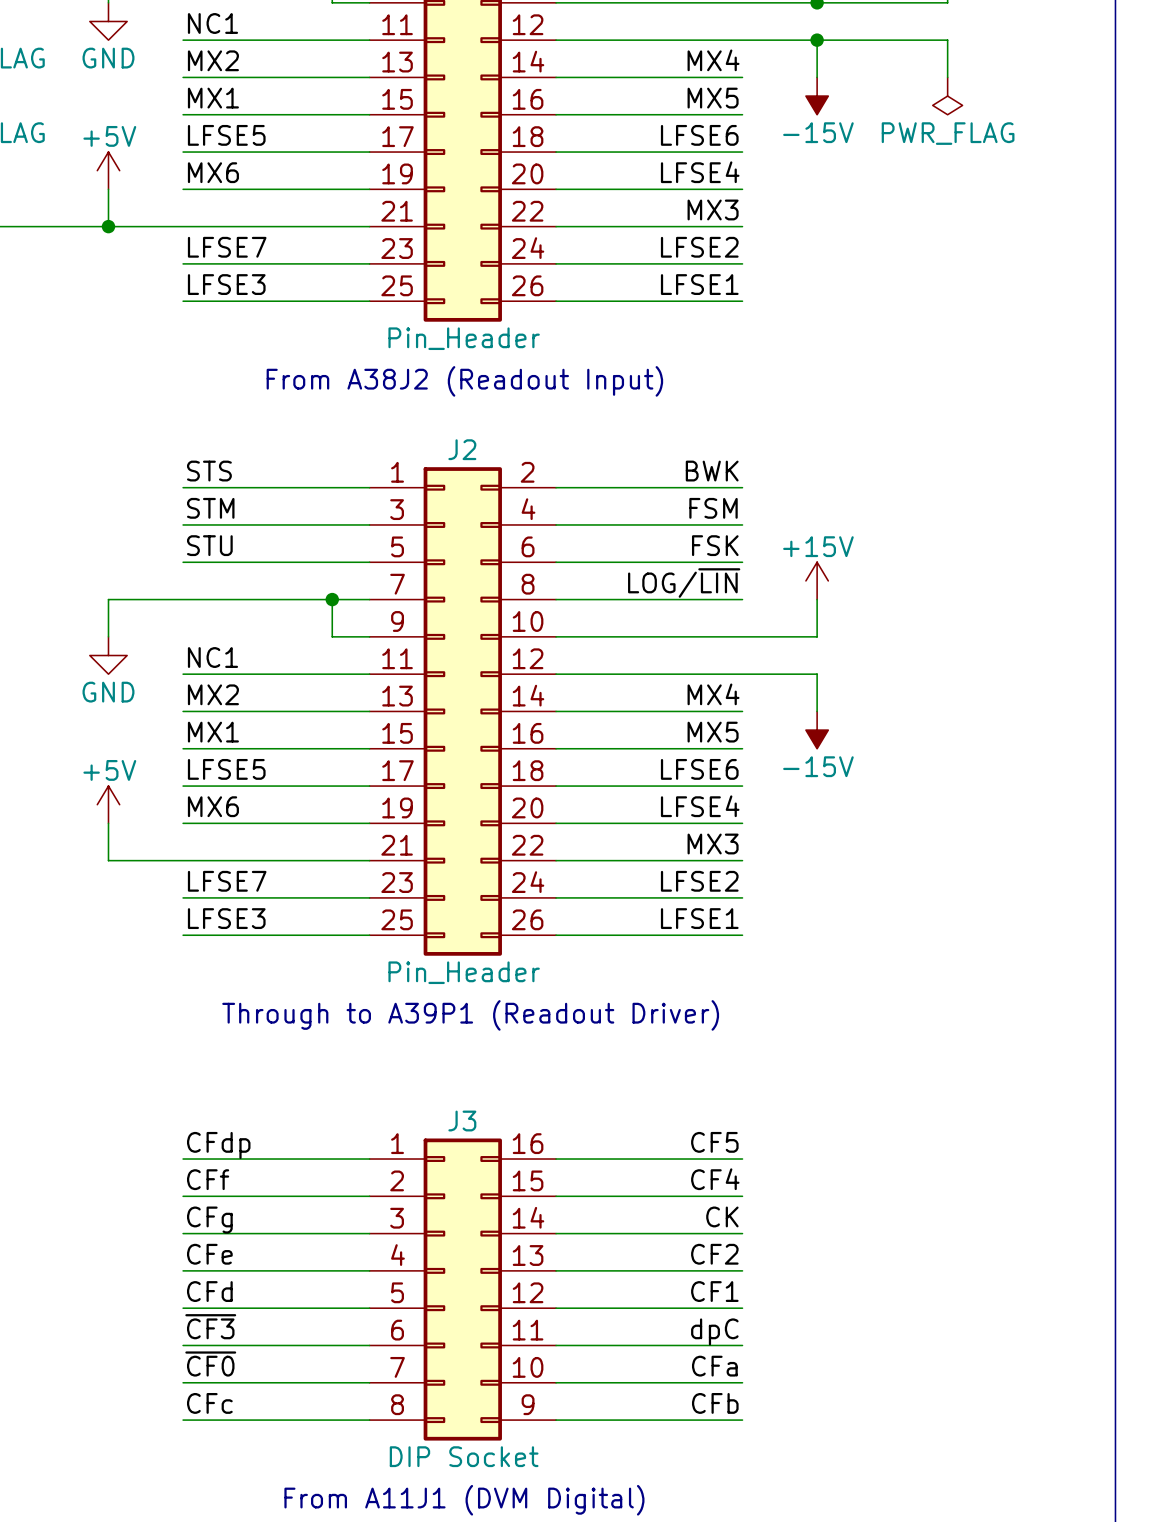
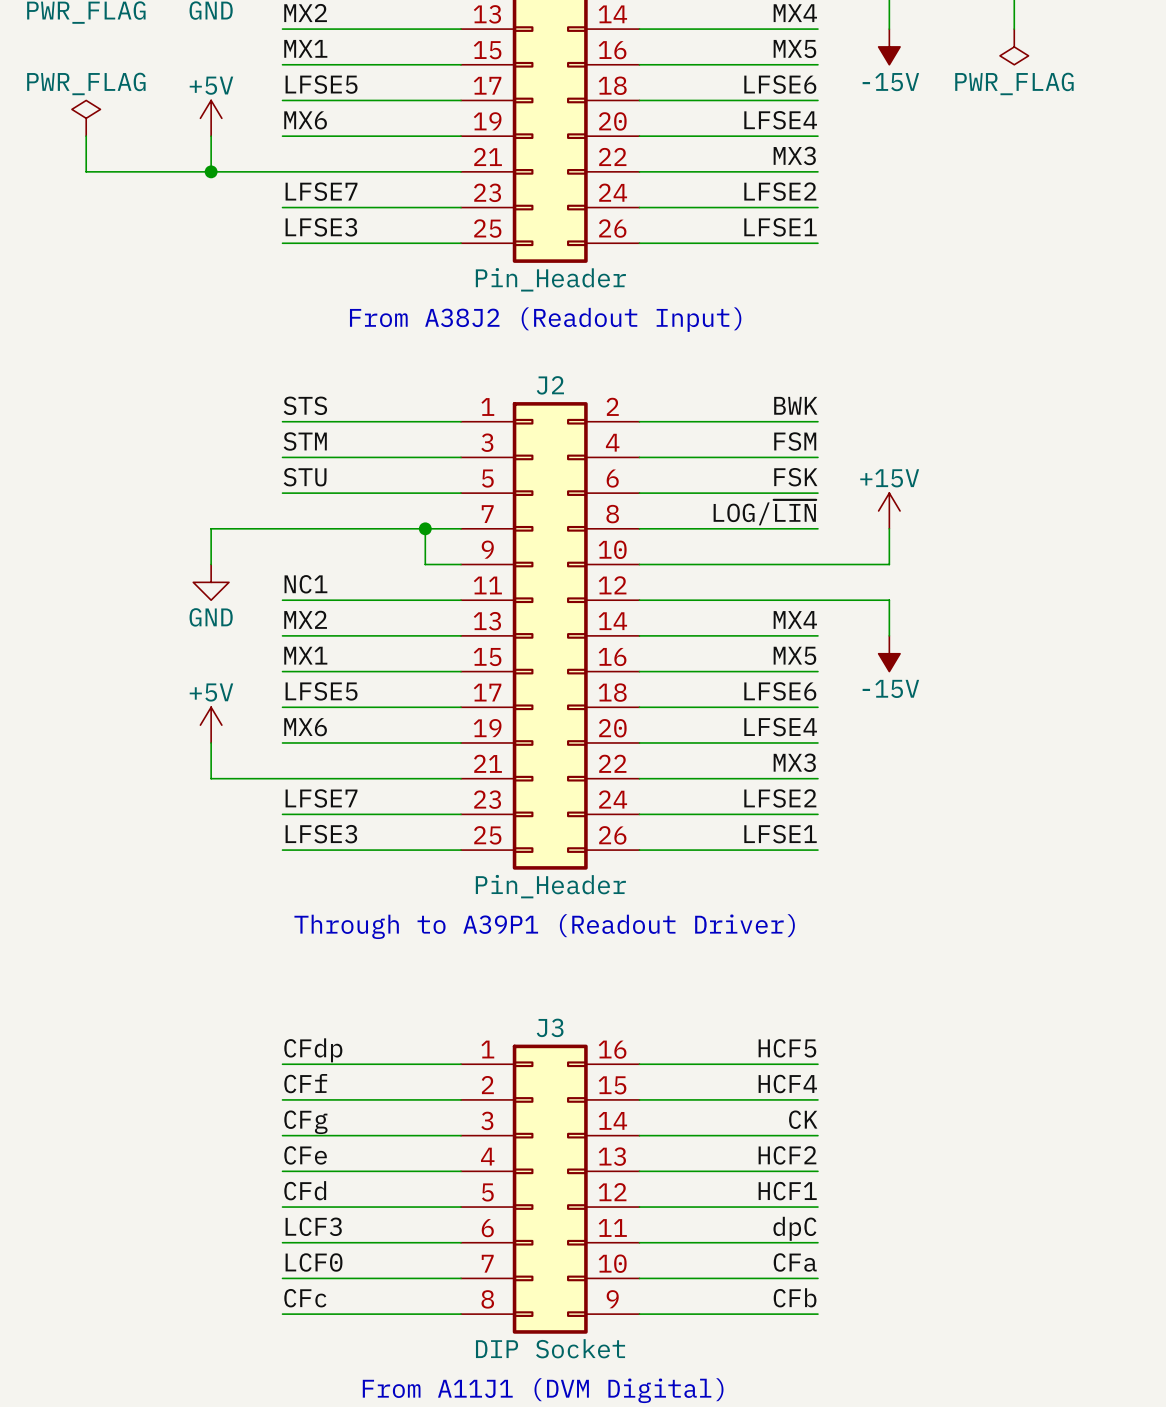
label: CF5 (714, 1142) -> HCF5 (787, 1048)
label: CF4 (715, 1179) -> HCF4 (787, 1084)
label: CF2 (714, 1254) -> HCF2 (787, 1155)
label: CF1 (714, 1291) -> HCF1 (787, 1191)
label: ~{CF3} (210, 1326) -> LCF3 (313, 1226)
label: ~{CF0} (210, 1363) -> LCF0 (314, 1262)

